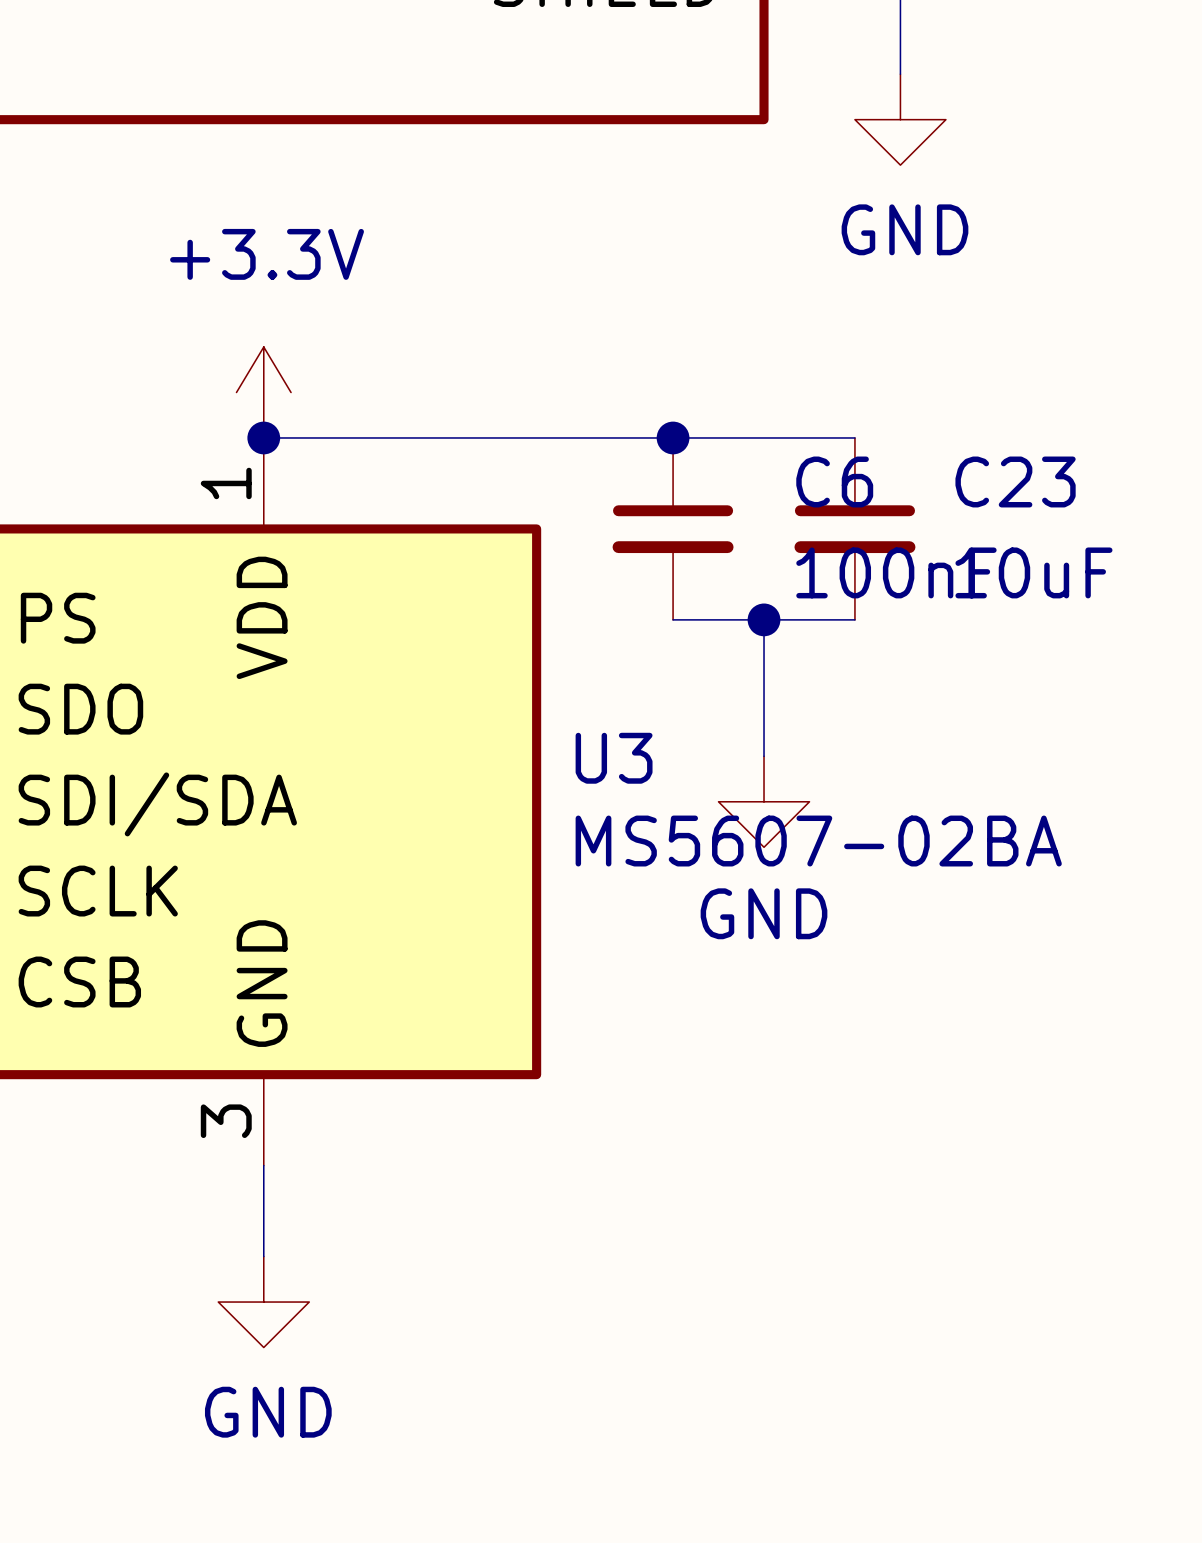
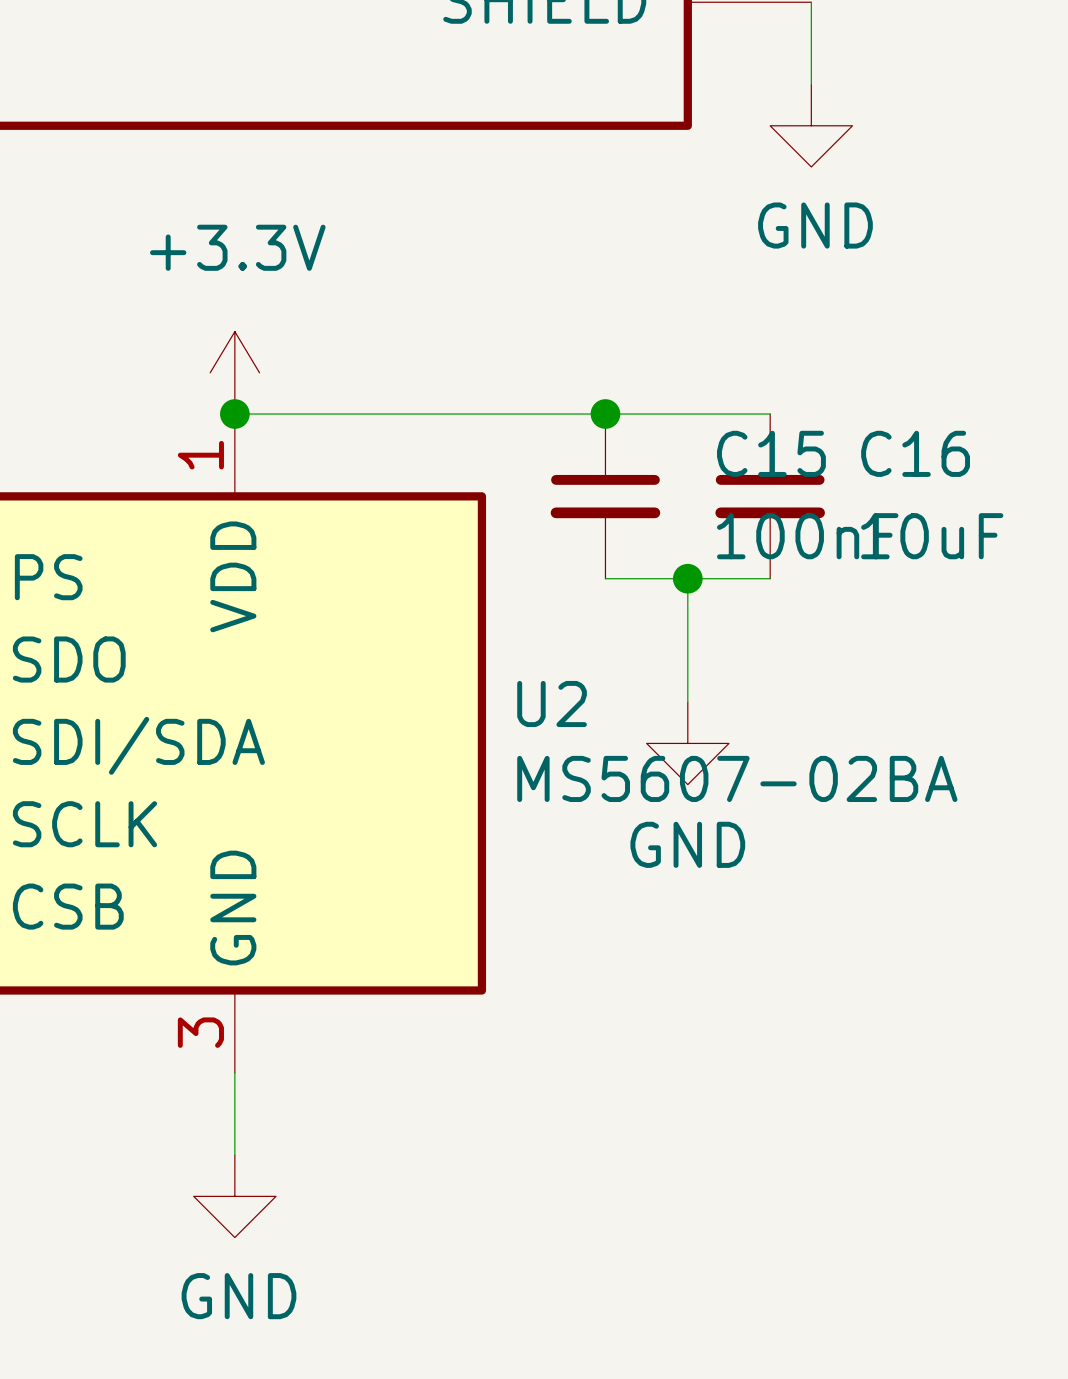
C6 name: C6 (834, 481) -> C15 (771, 453)
C23 name: C23 (1015, 481) -> C16 (915, 453)
U3 name: U3 (614, 758) -> U2 (552, 704)

